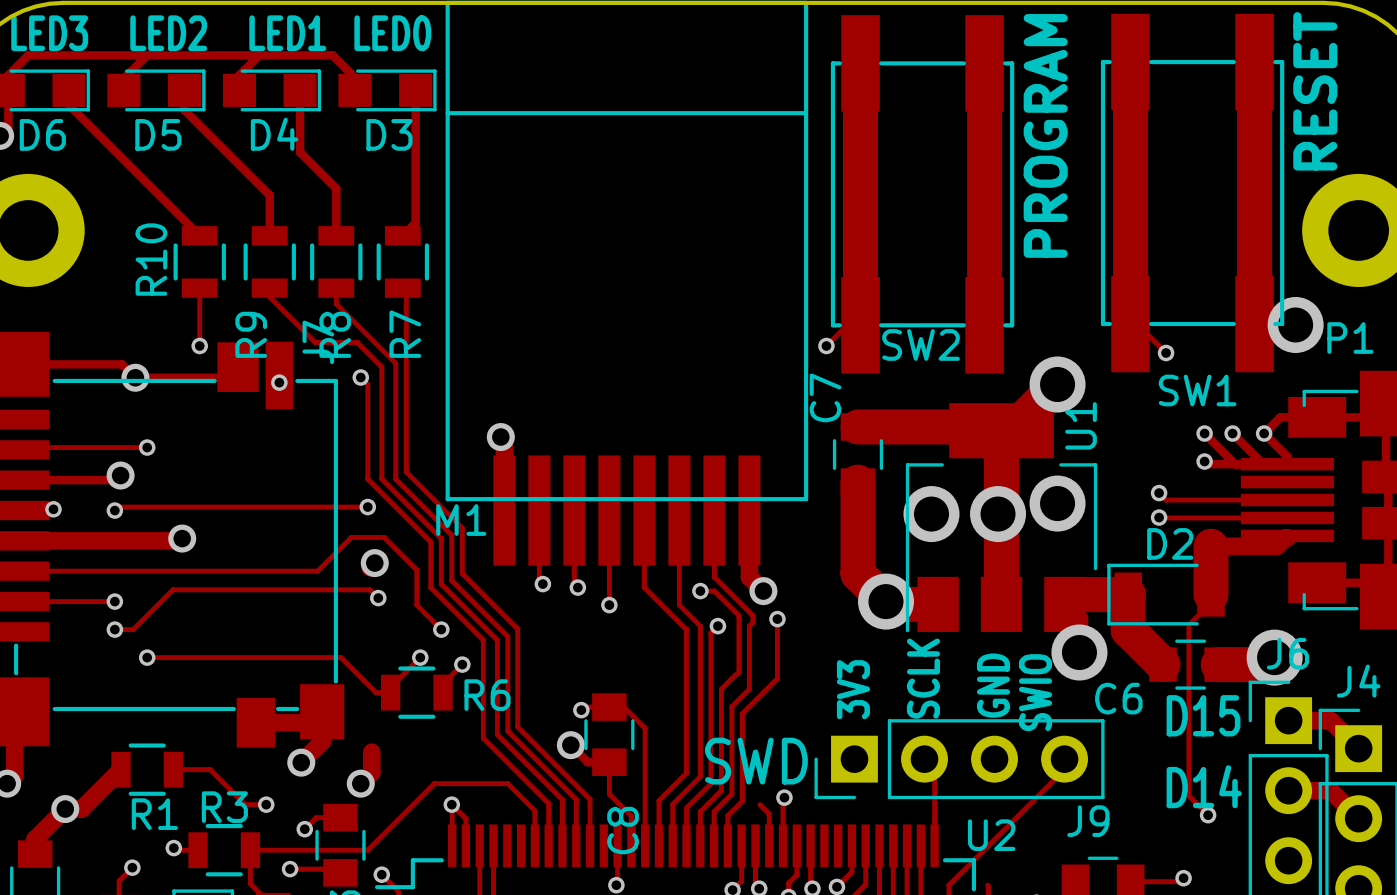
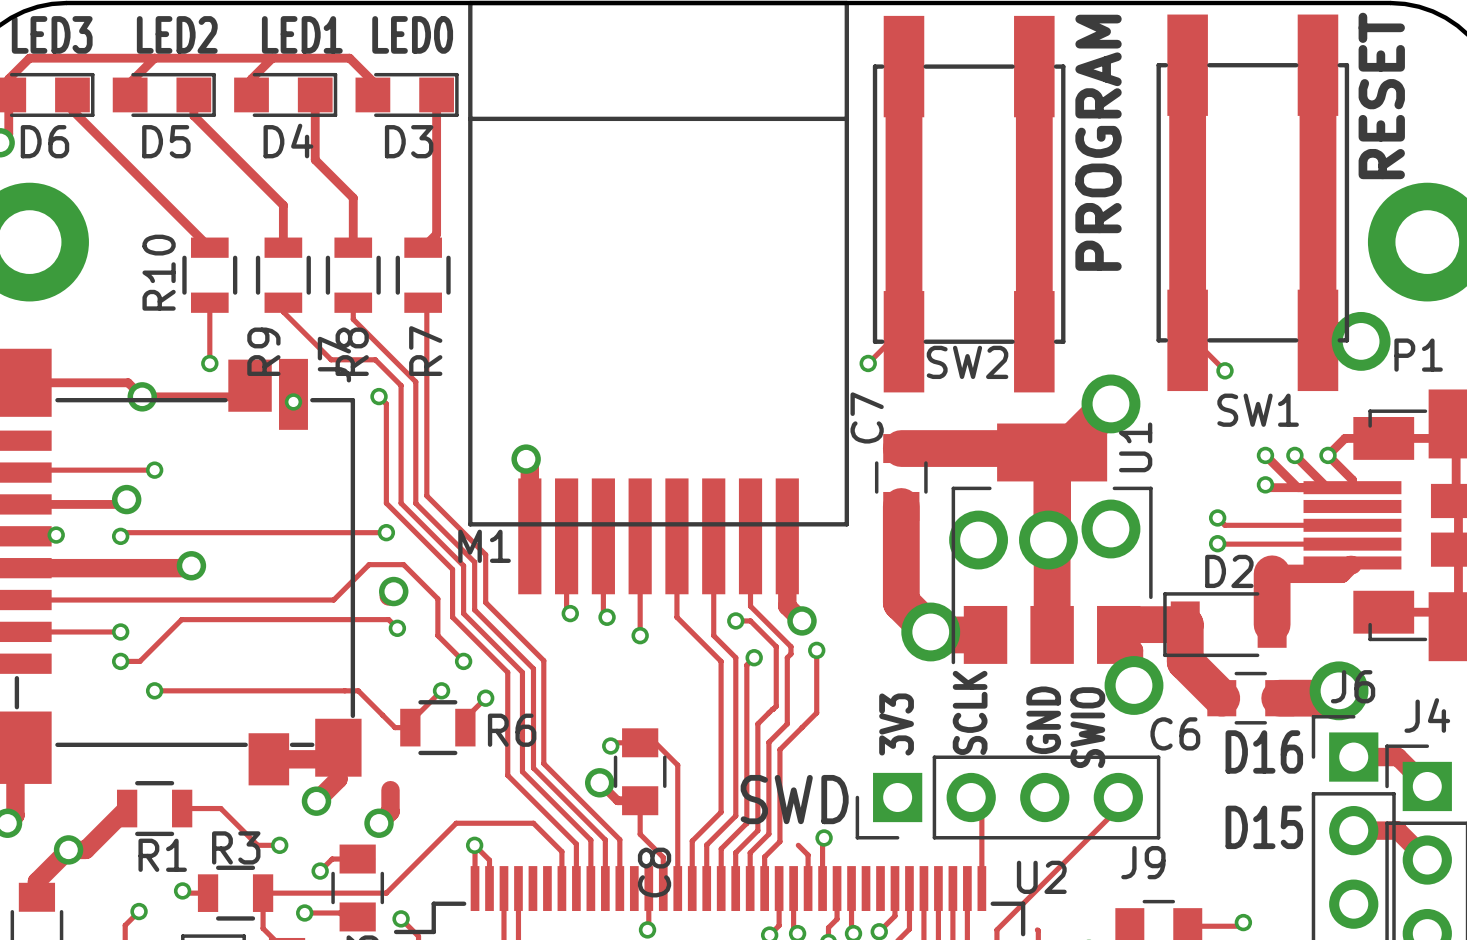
track: (1210, 594) (1210, 602) (1188, 624) (1188, 795) (1208, 815) -> none
text: D15 (1203, 715) -> D16 (1264, 751)
text: D14 (1204, 786) -> D15 (1264, 827)
via: (1208, 815) -> none

